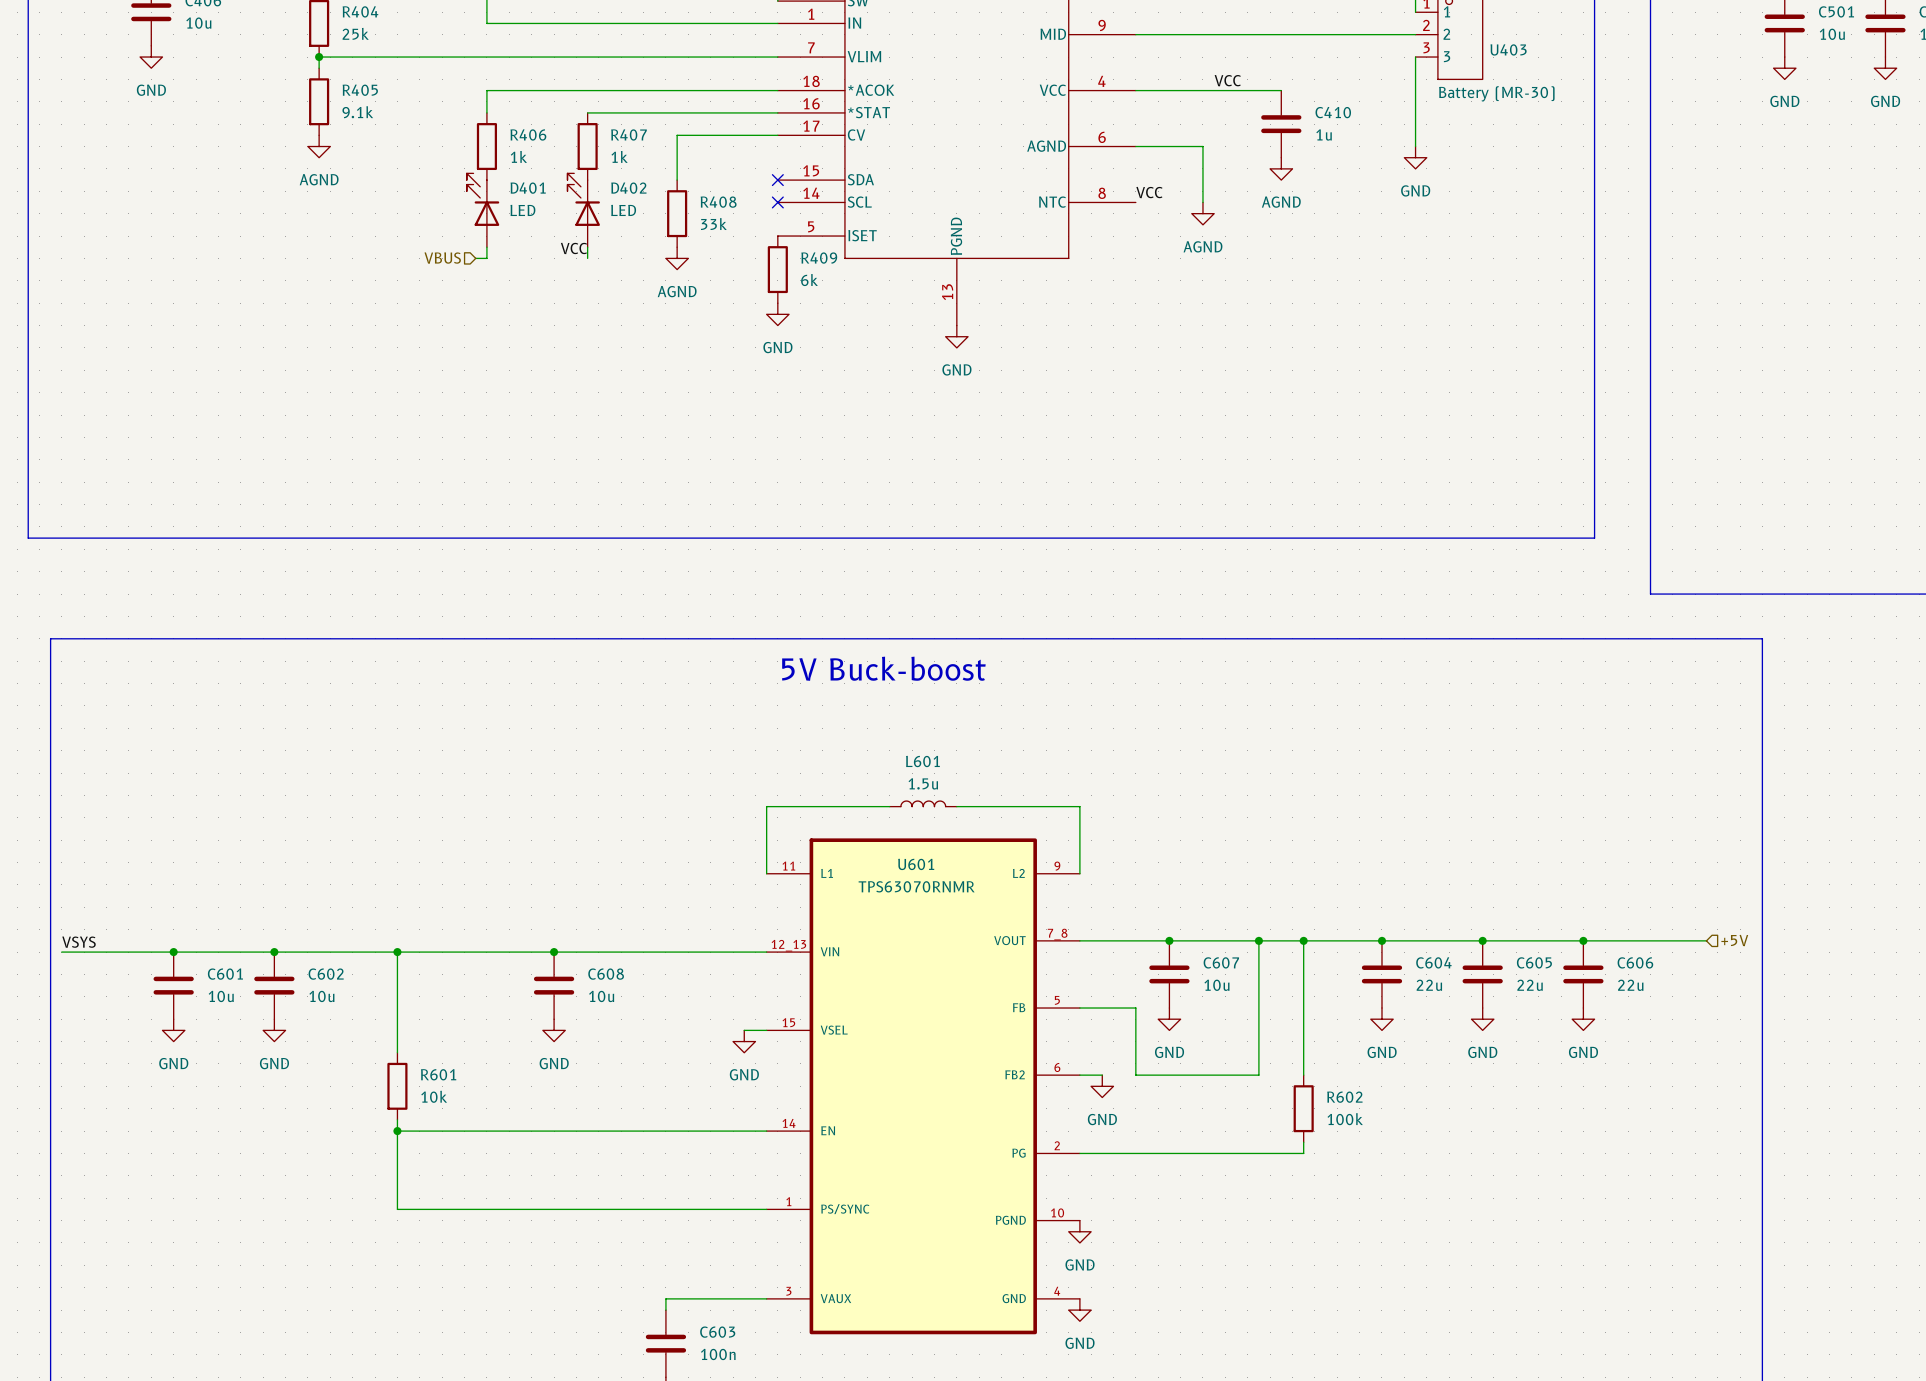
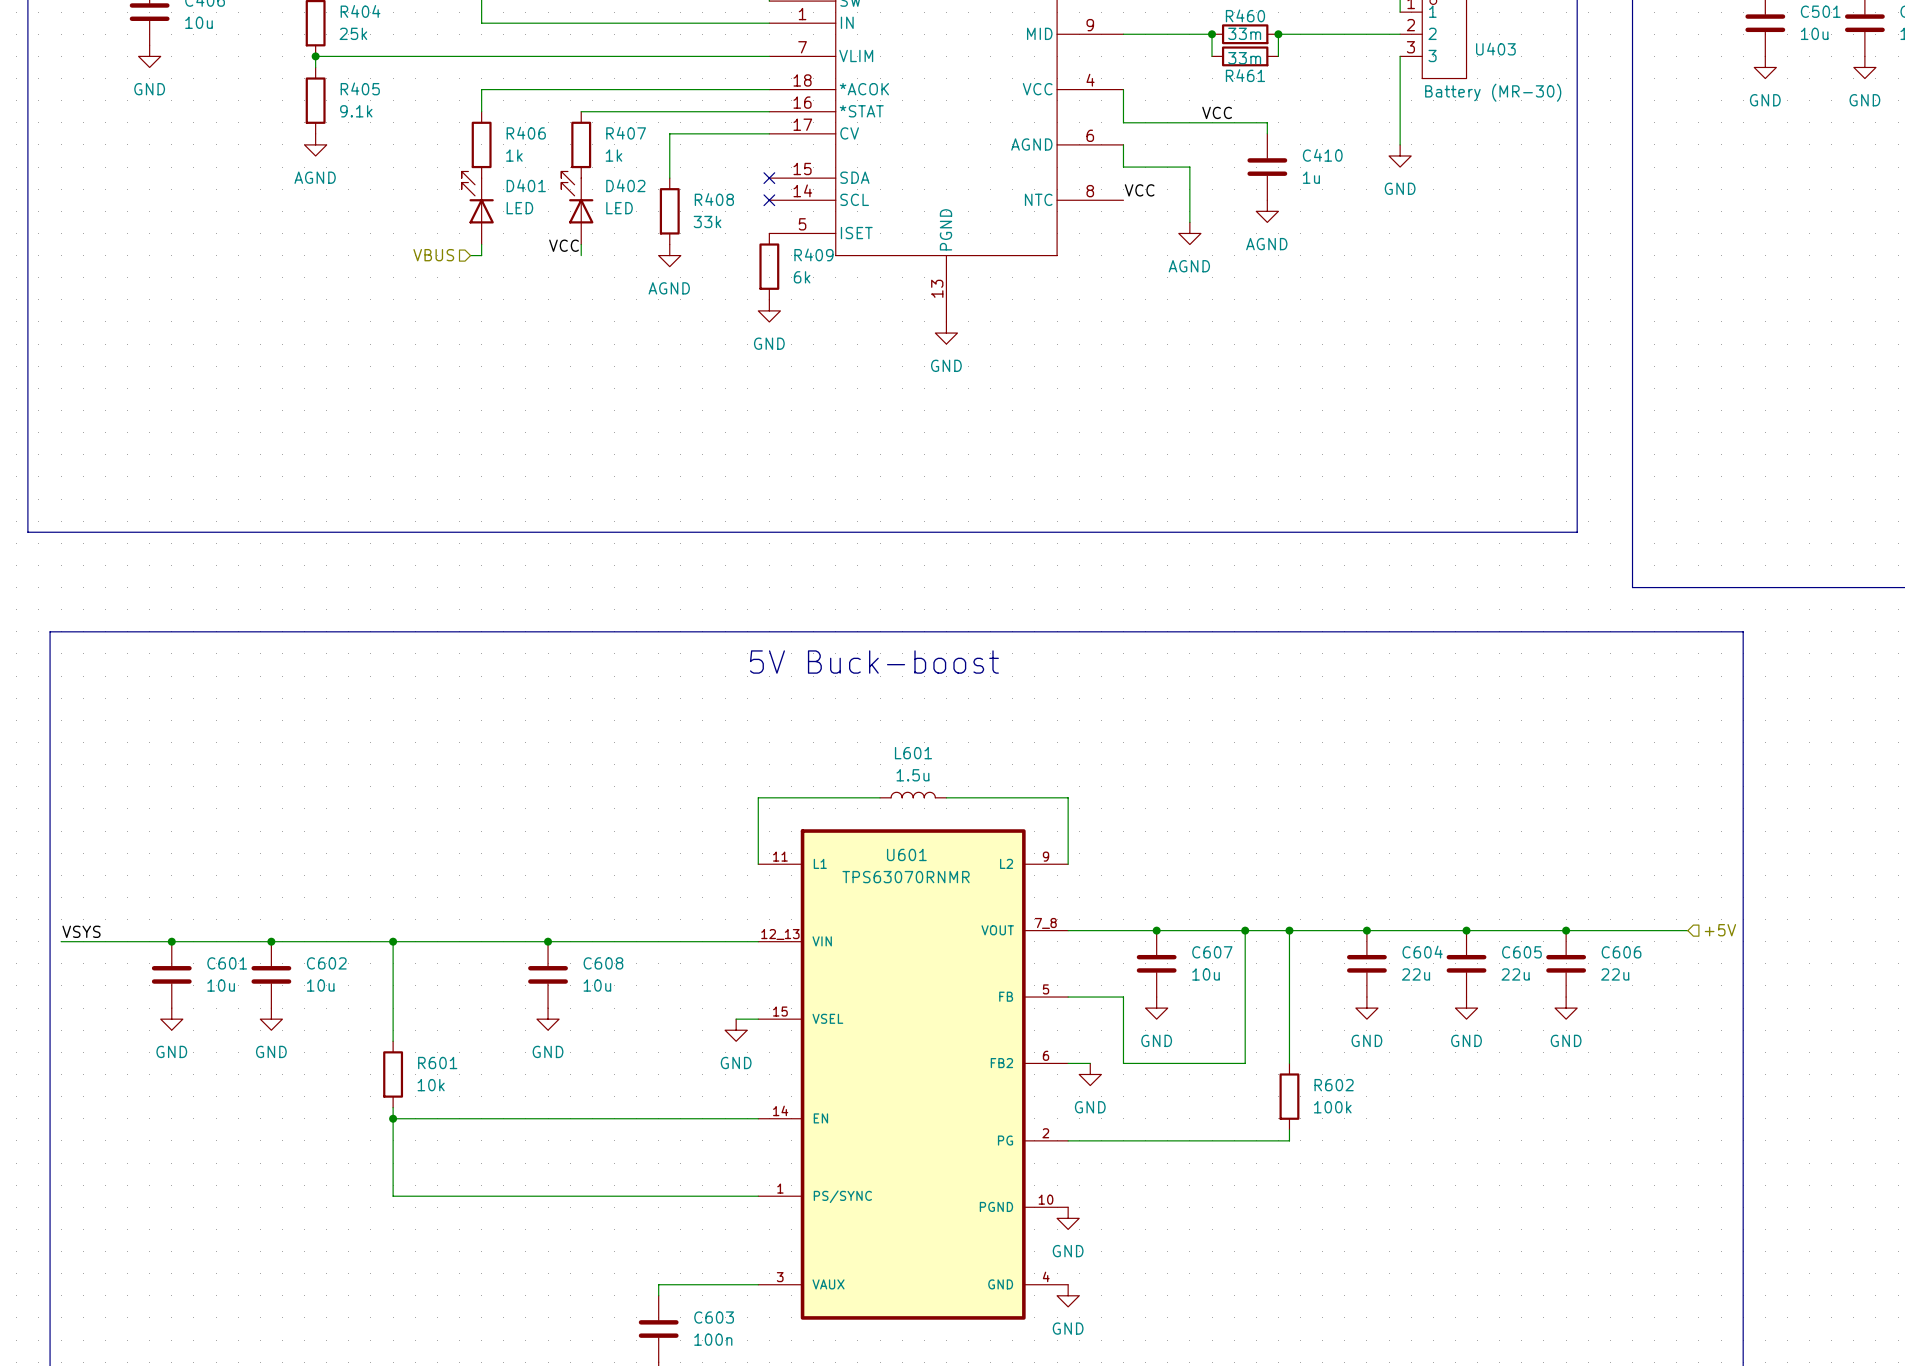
wire: (1225, 34) (1292, 34) -> (1212, 34) (1212, 56)
junction: none -> (1212, 34)
R460: none -> 33m (1245, 34)
wire: none -> (1278, 34) (1278, 56)
junction: none -> (1278, 34)
R461: none -> 33m (1245, 56)
label position: VCC (1227, 80) -> VCC (1217, 112)
wire: (1135, 90) (1281, 90) -> (1123, 89) (1123, 122) (1267, 122) (1267, 133)
C410 position: (1281, 124) -> (1267, 167)
wire: (1135, 146) (1202, 146) (1202, 168) -> (1123, 144) (1123, 167) (1189, 167)
power symbol: AGND (1281, 168) -> none
power symbol position: AGND (1202, 213) -> AGND (1189, 233)
power symbol: none -> AGND (1267, 211)

